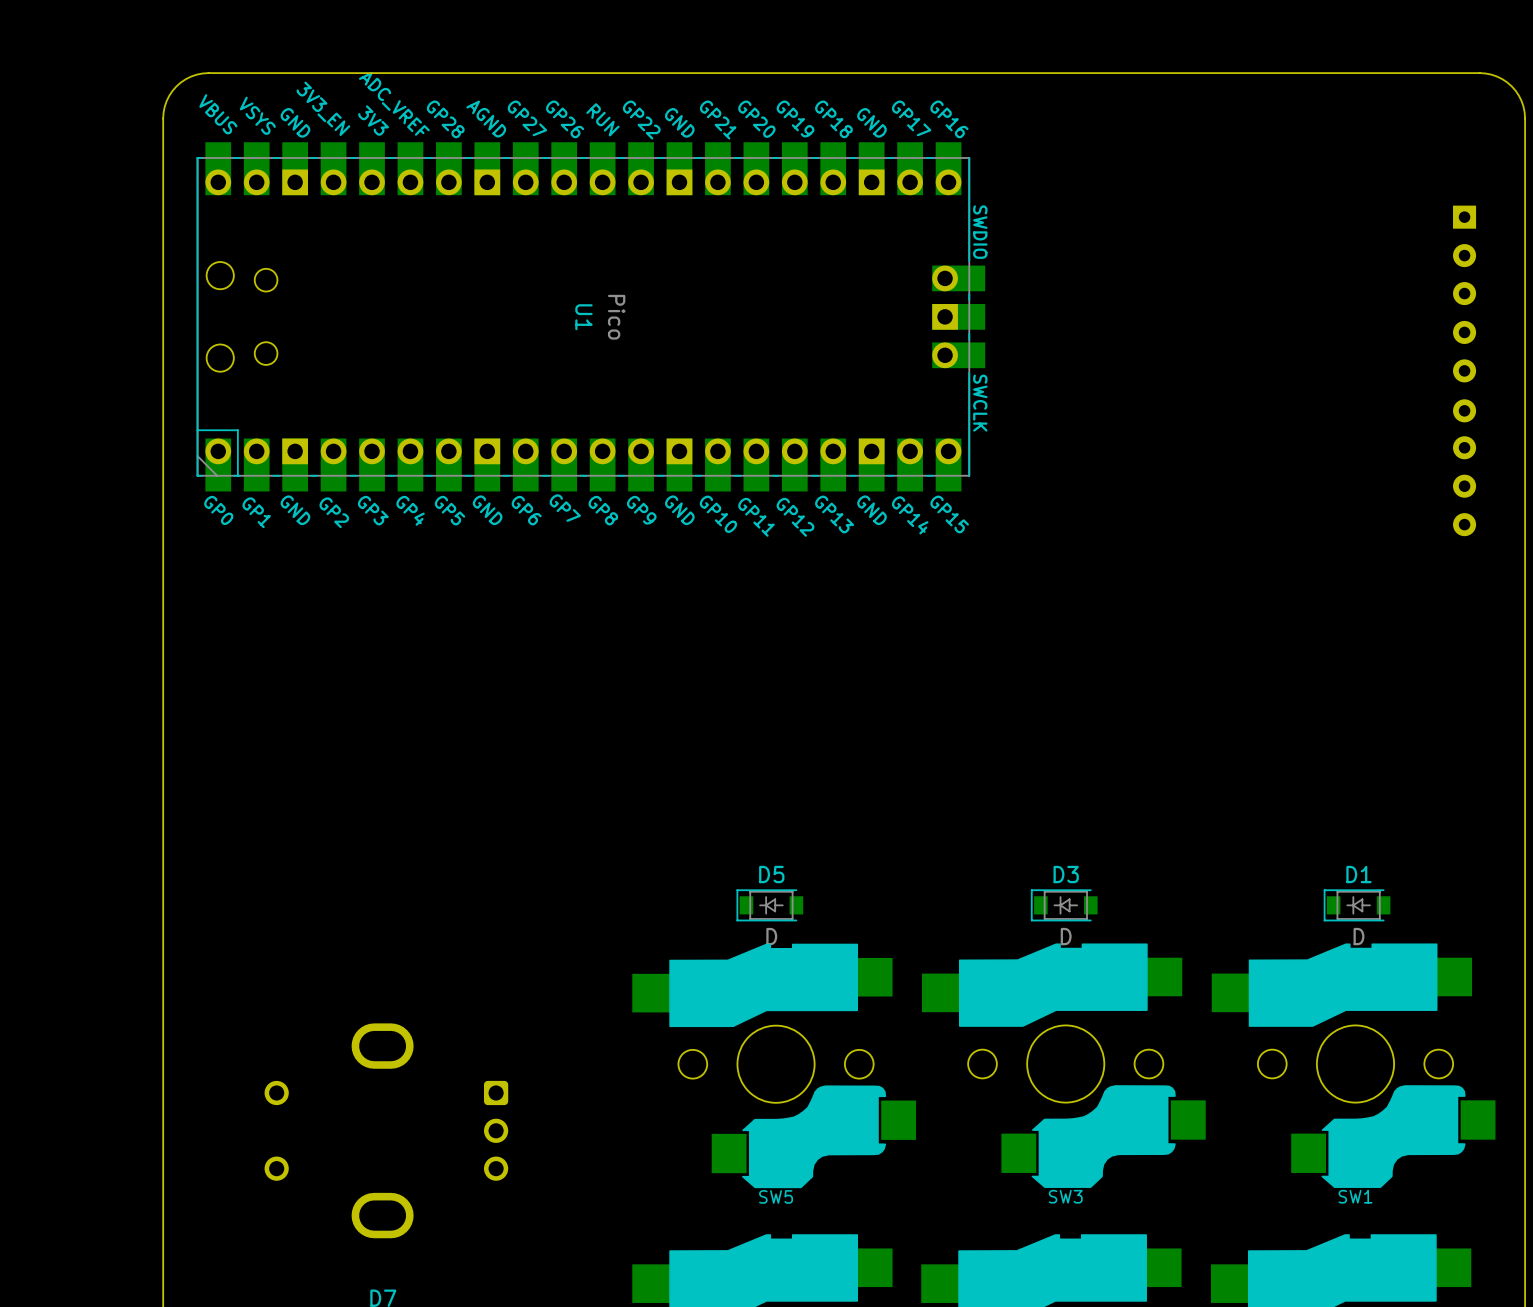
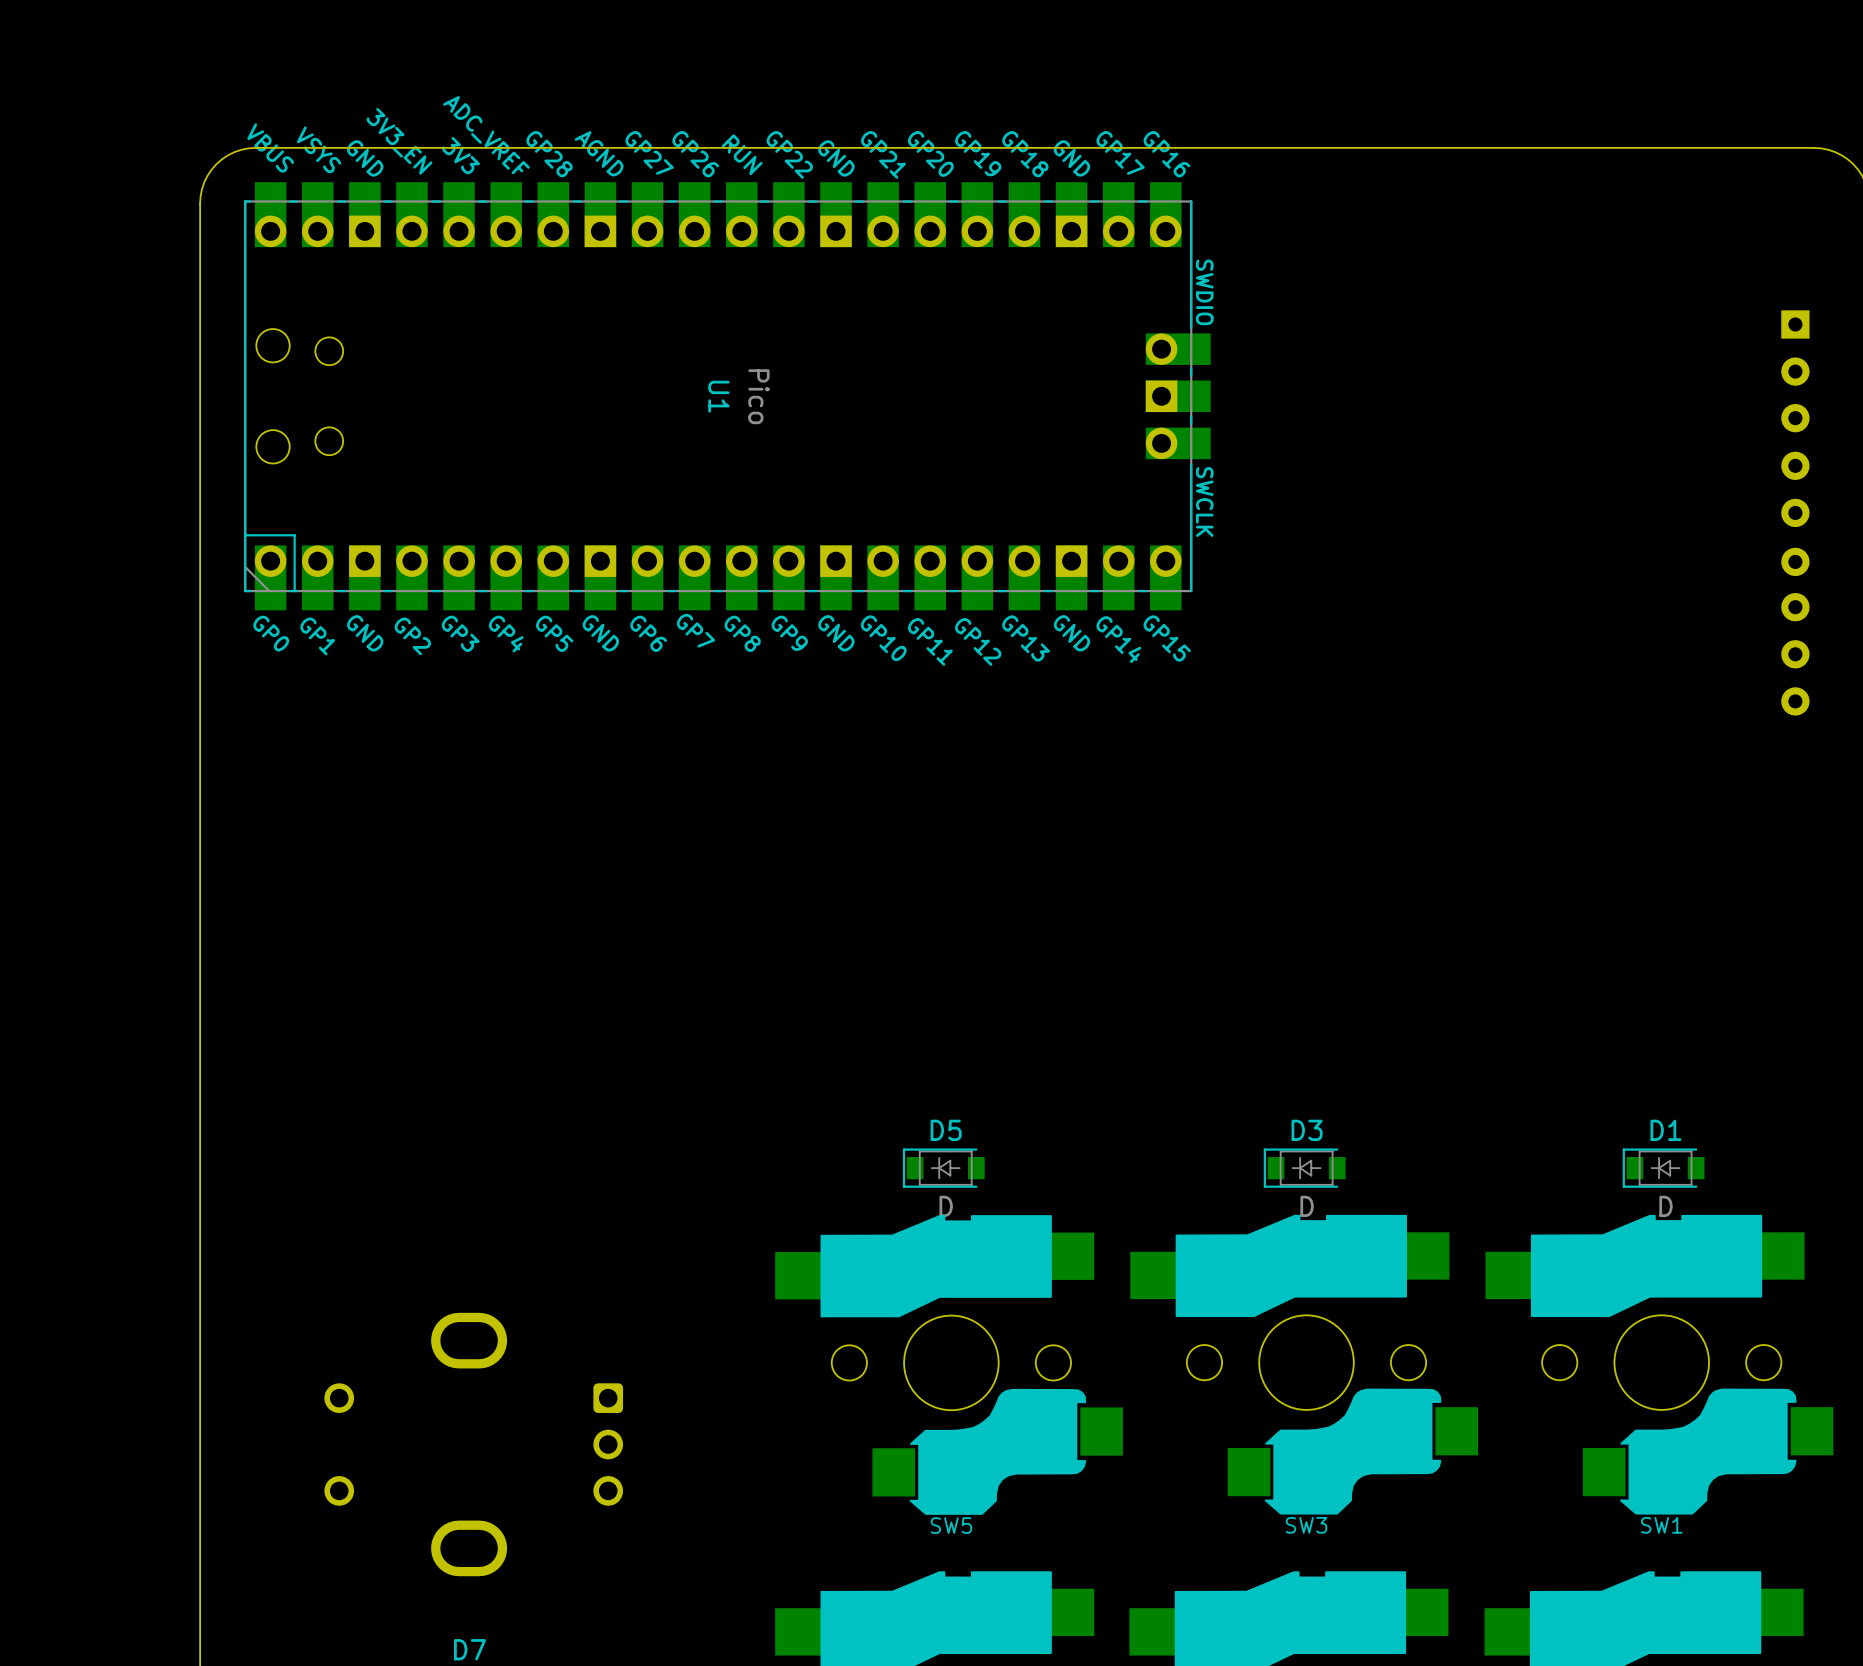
U1 position: (590, 316) -> (727, 396)

